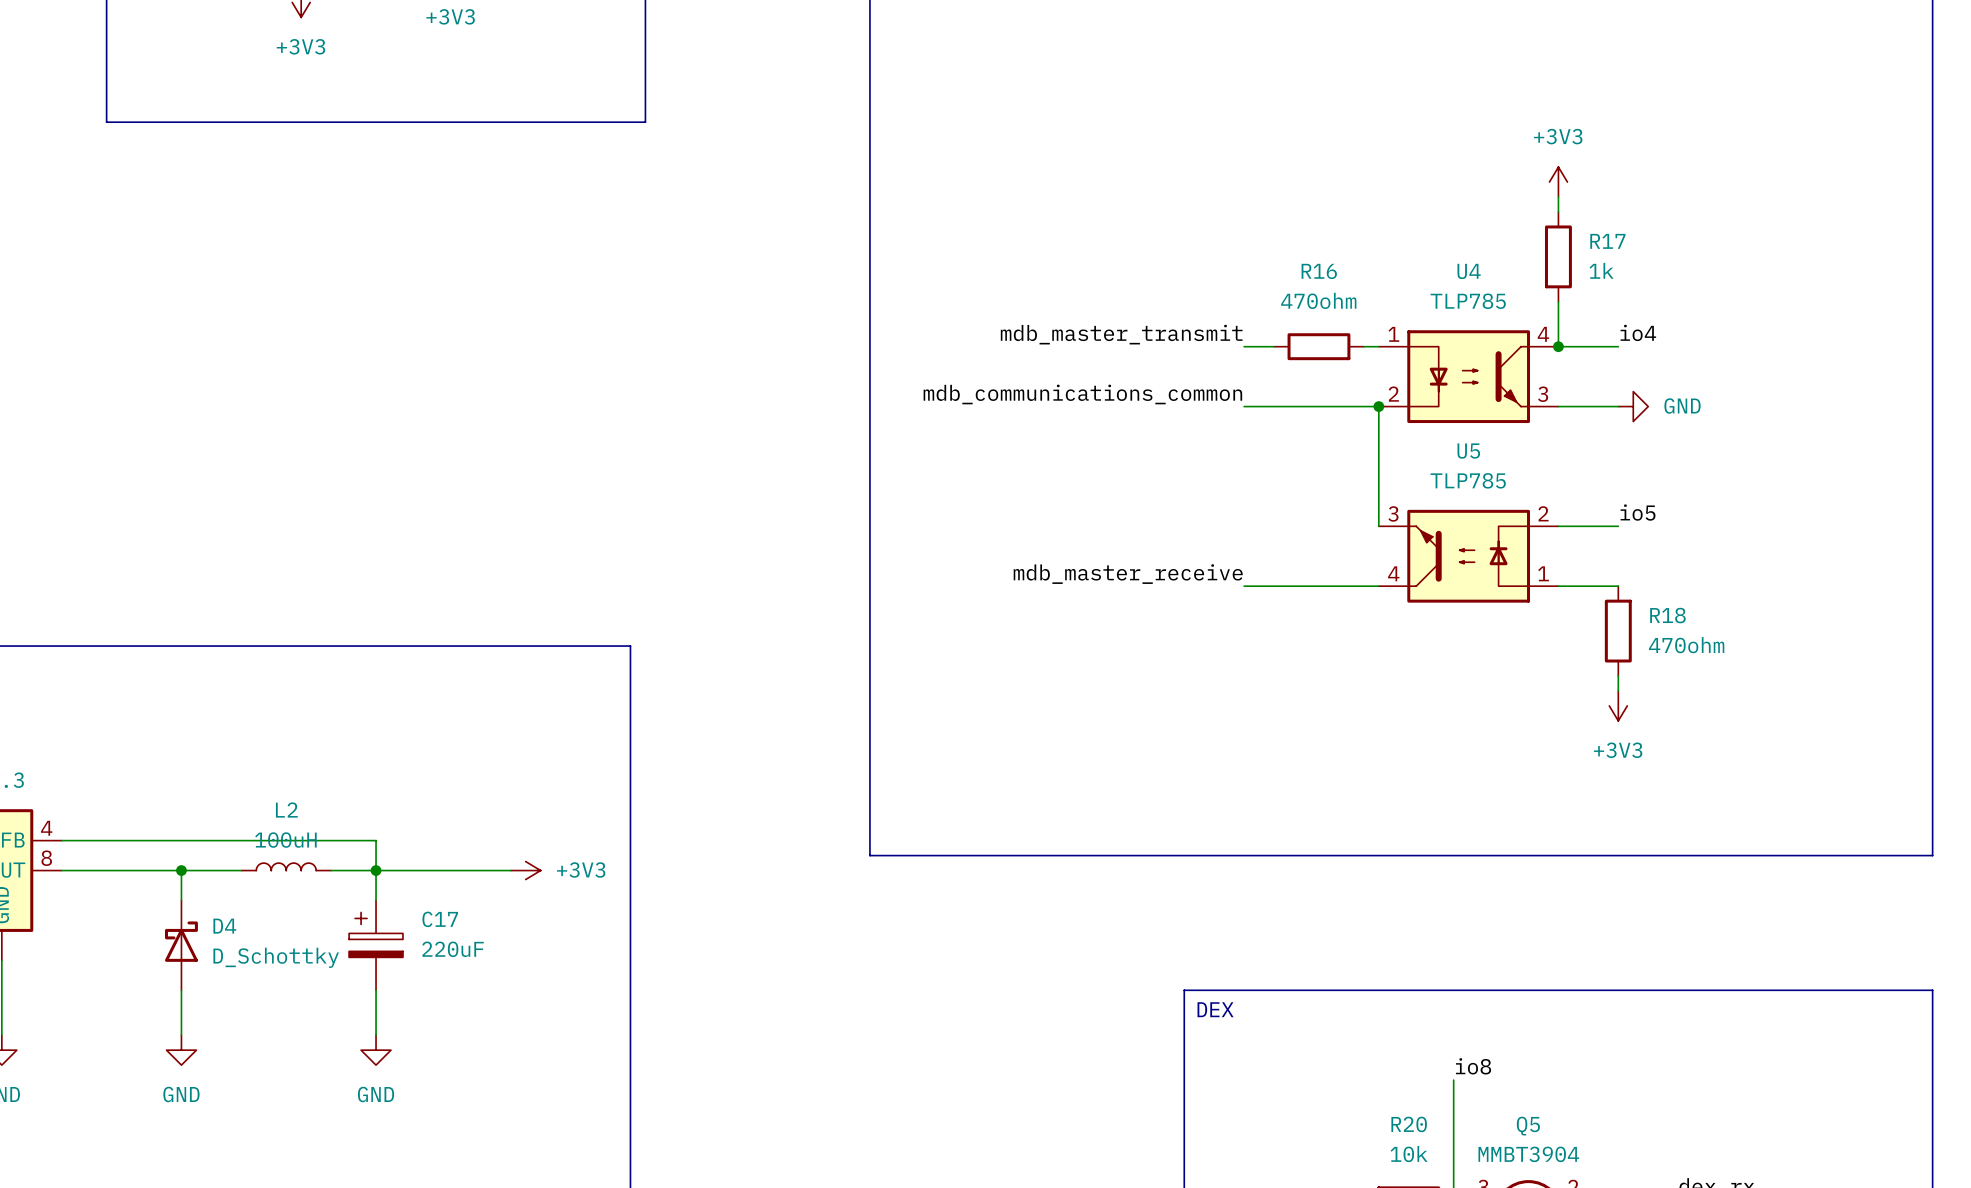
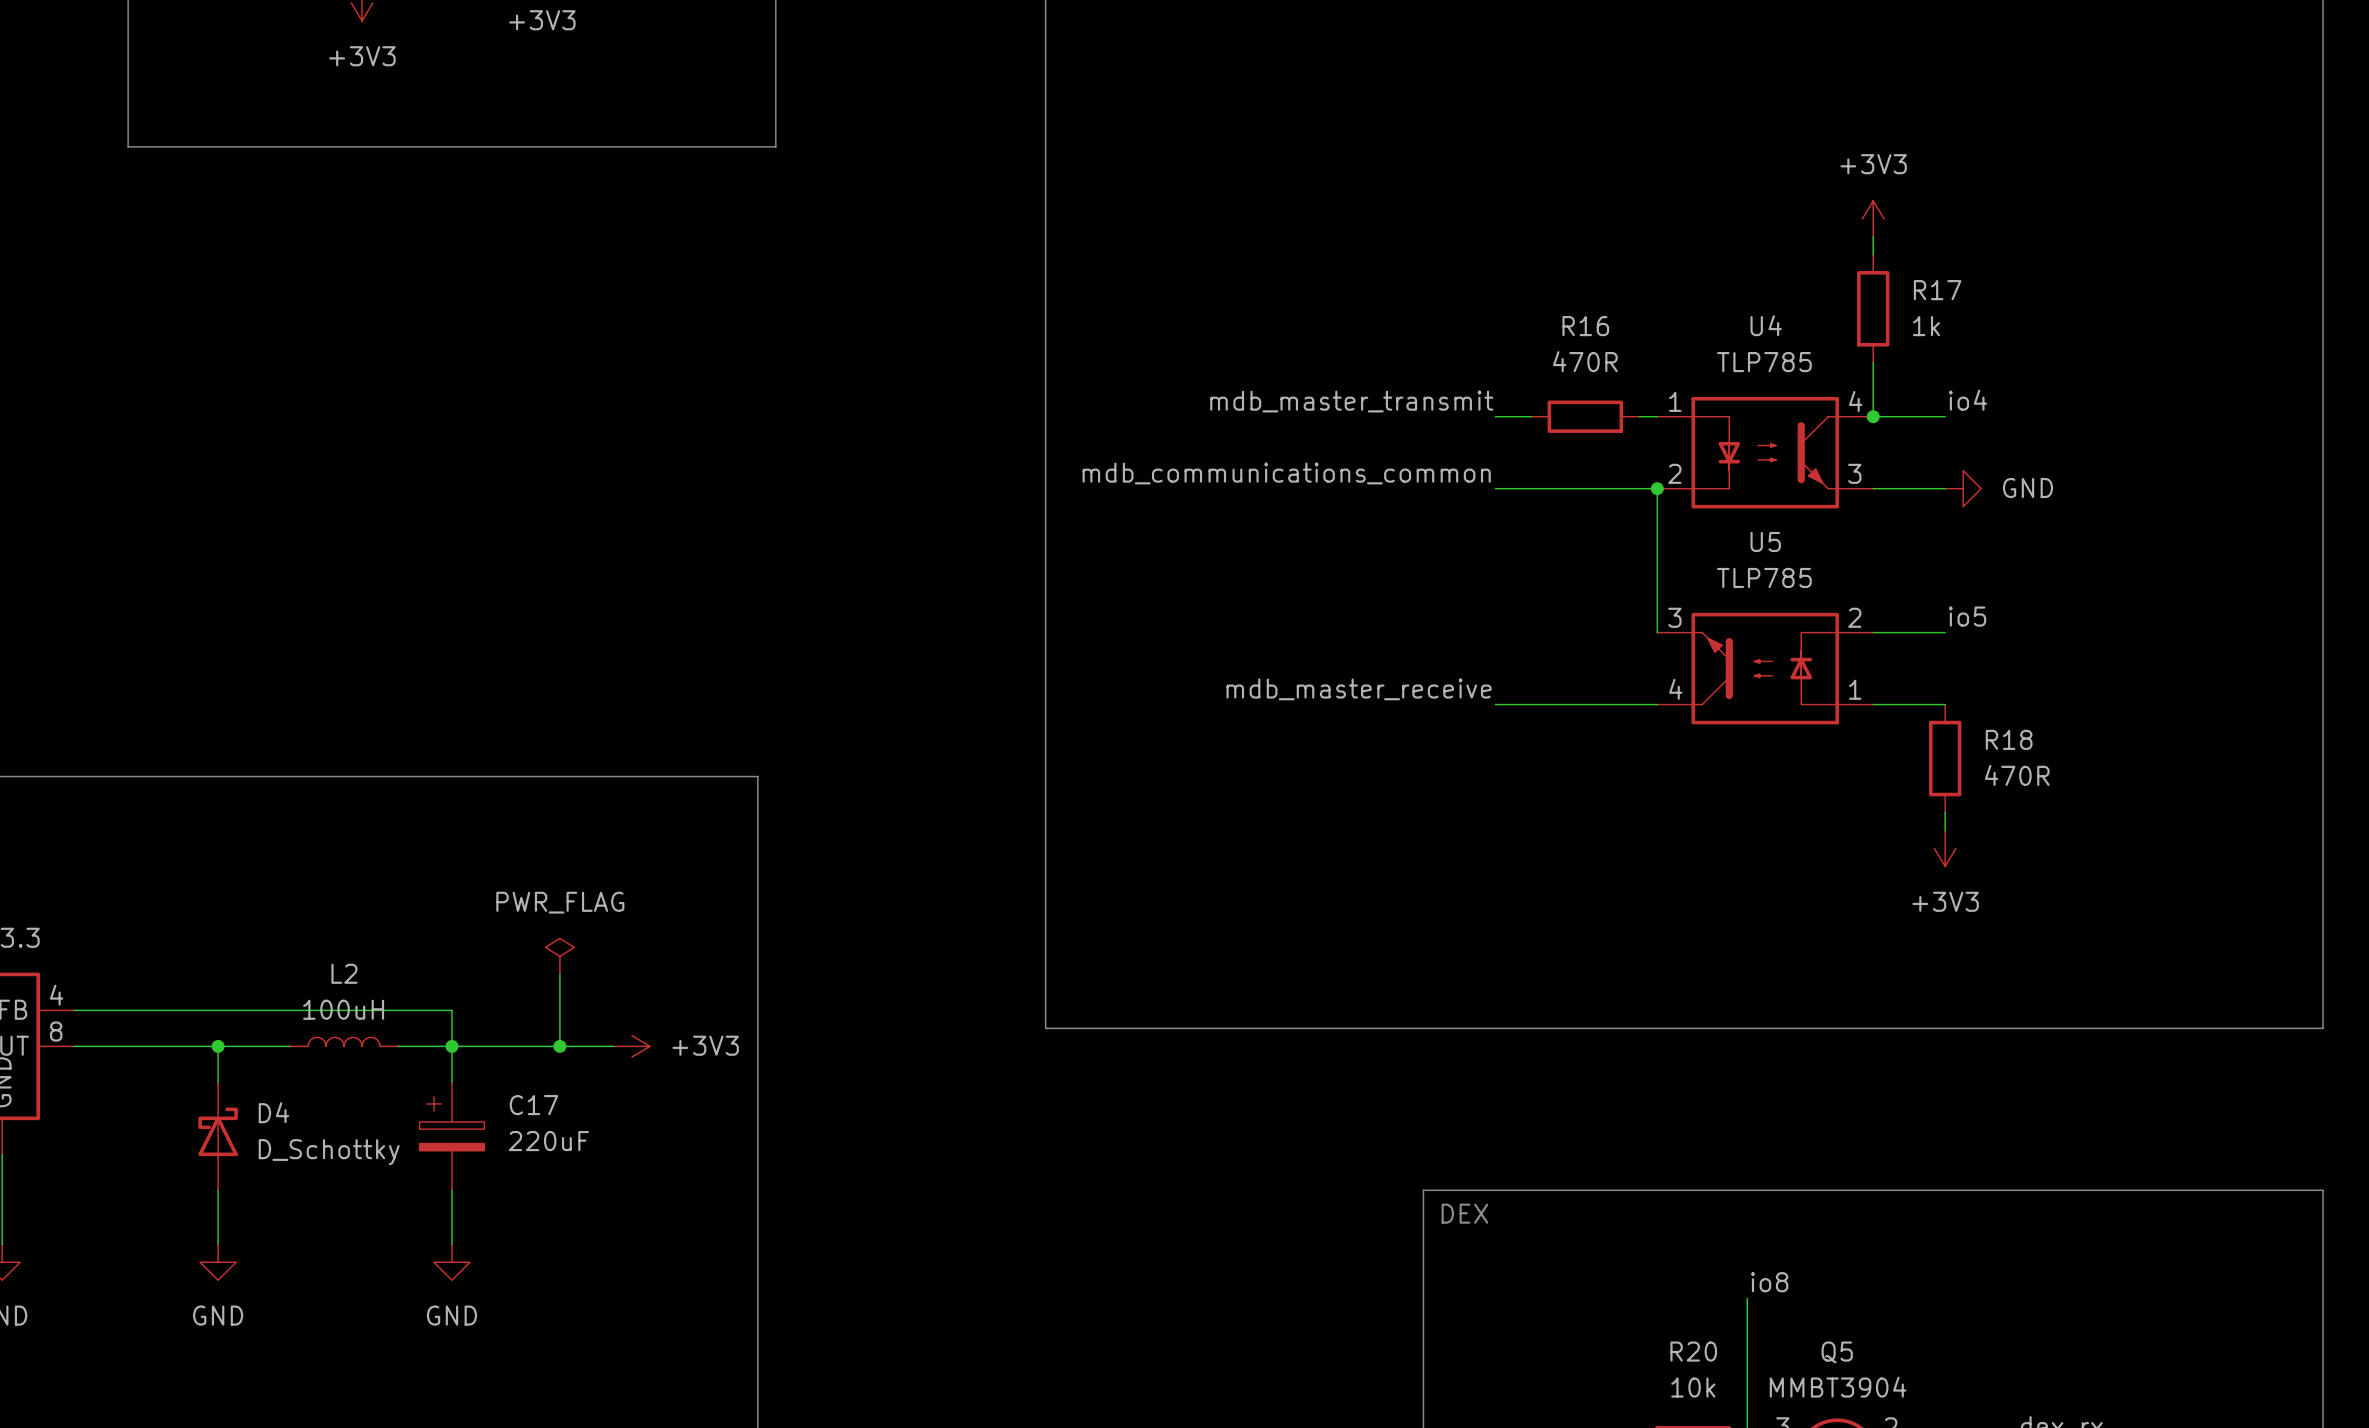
R16 value: 470ohm (1318, 300) -> 470R (1585, 361)
R18 value: 470ohm (1686, 645) -> 470R (2017, 775)
power symbol: none -> PWR_FLAG (559, 956)
wire: none -> (559, 974) (559, 1046)
junction: none -> (559, 1046)

